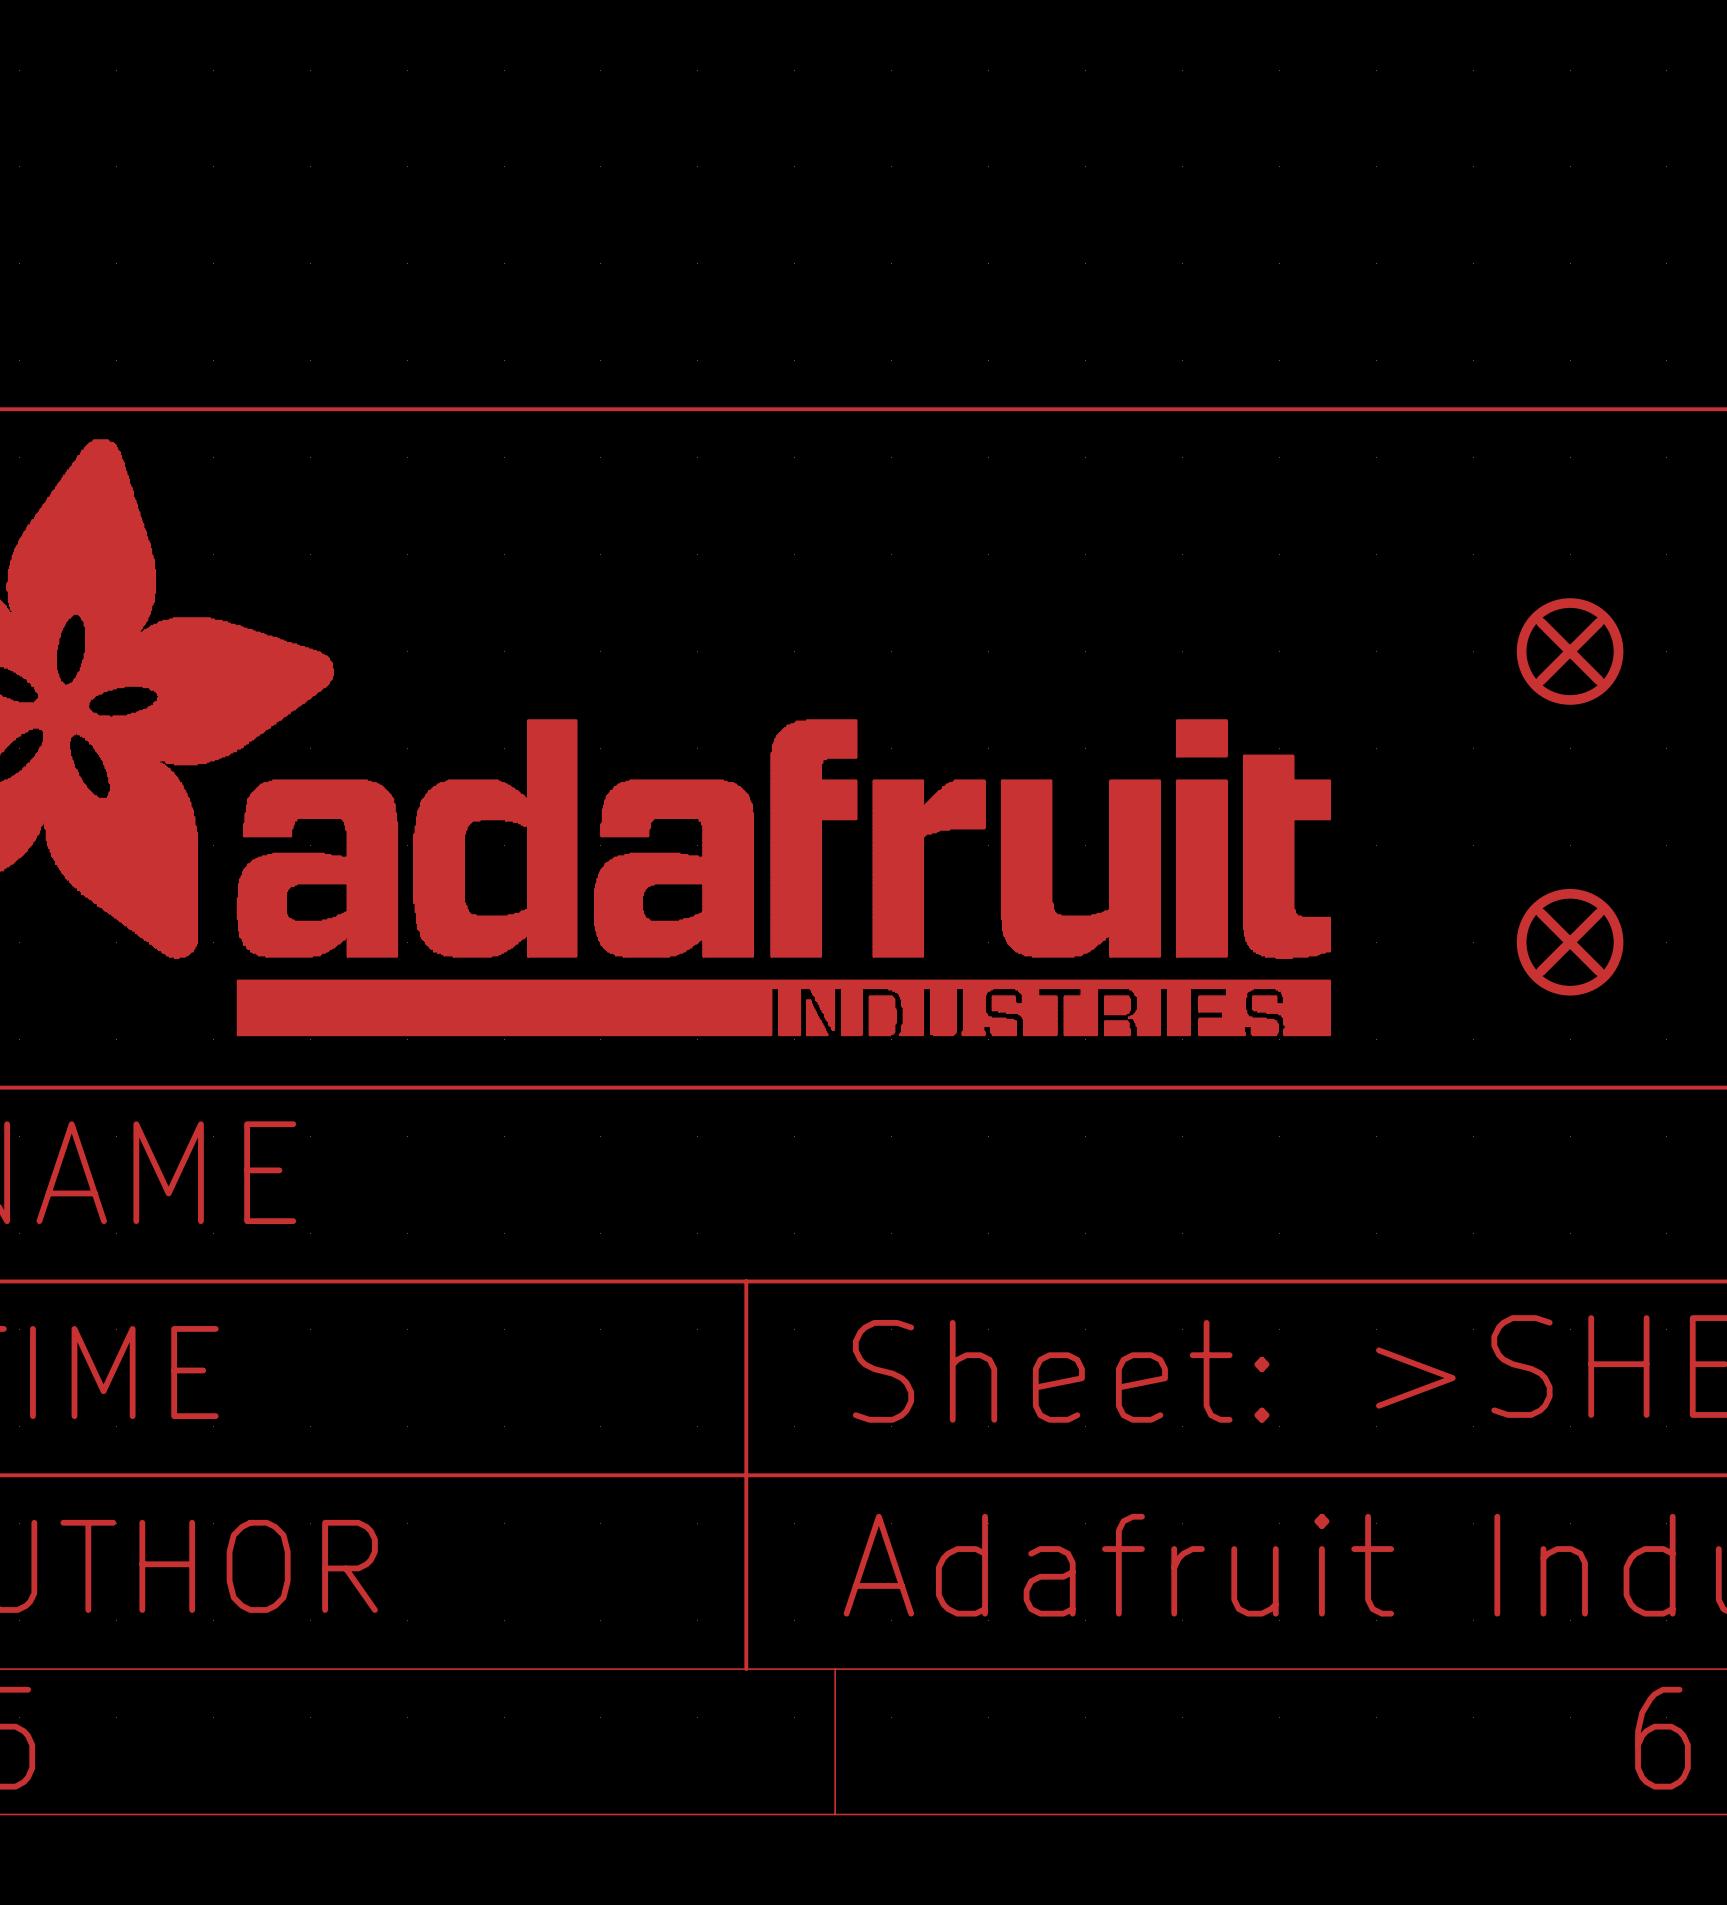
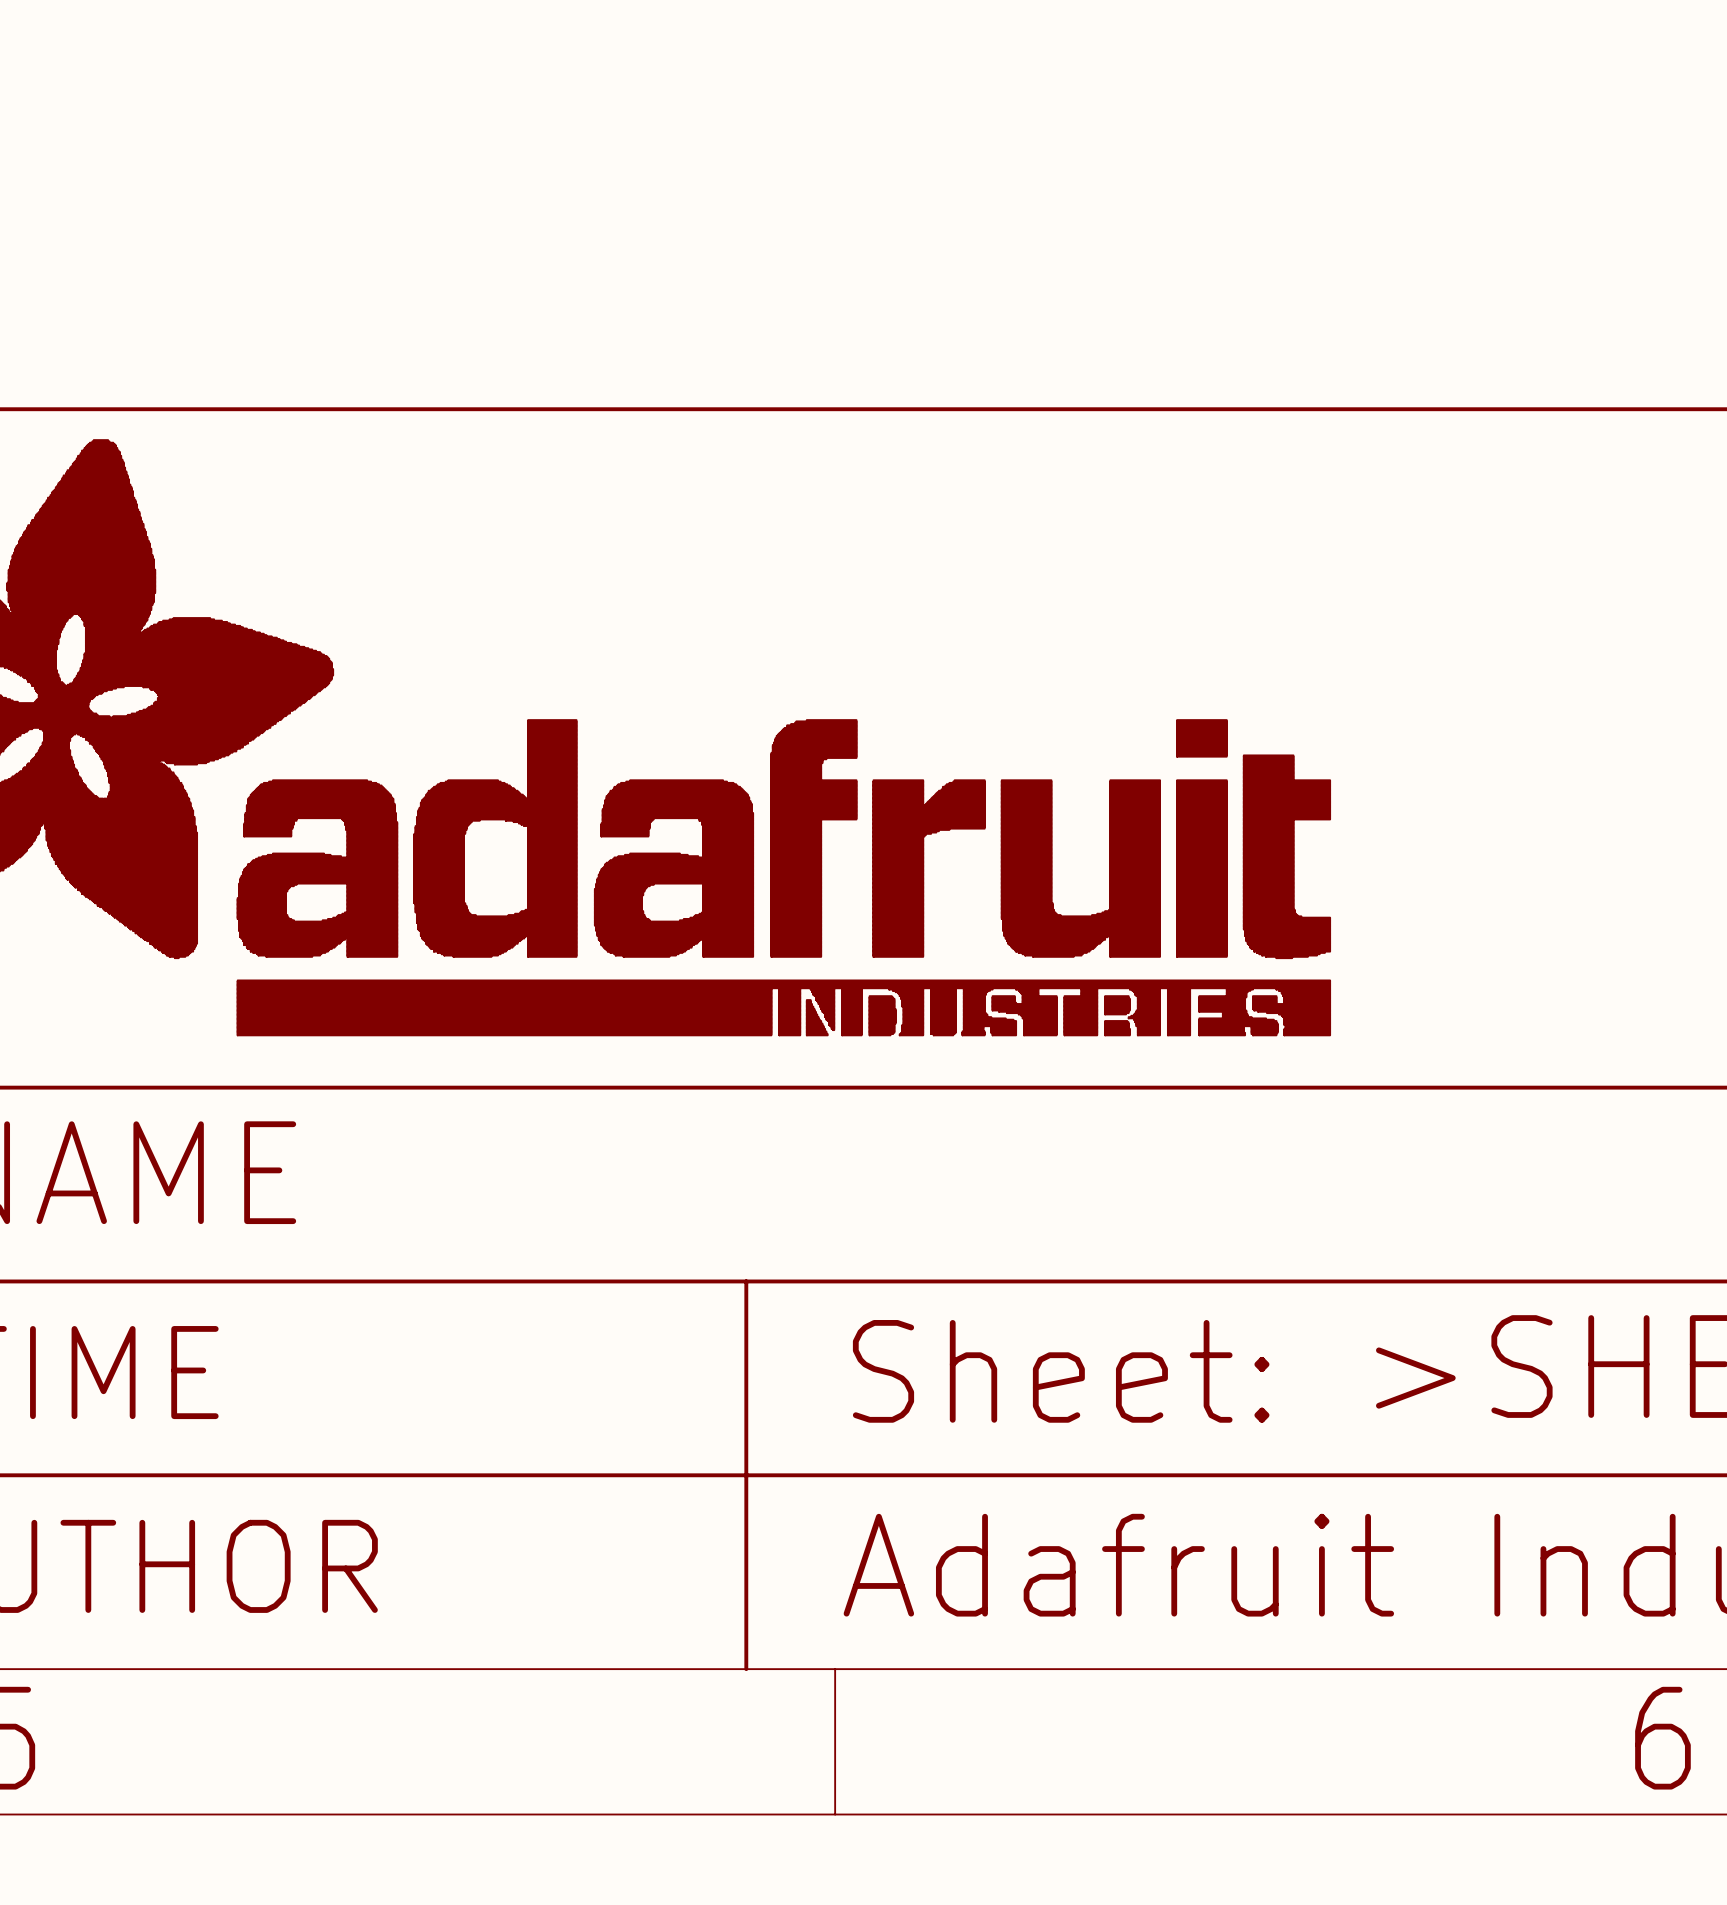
part: (1570, 651) -> none
part: (1570, 942) -> none

